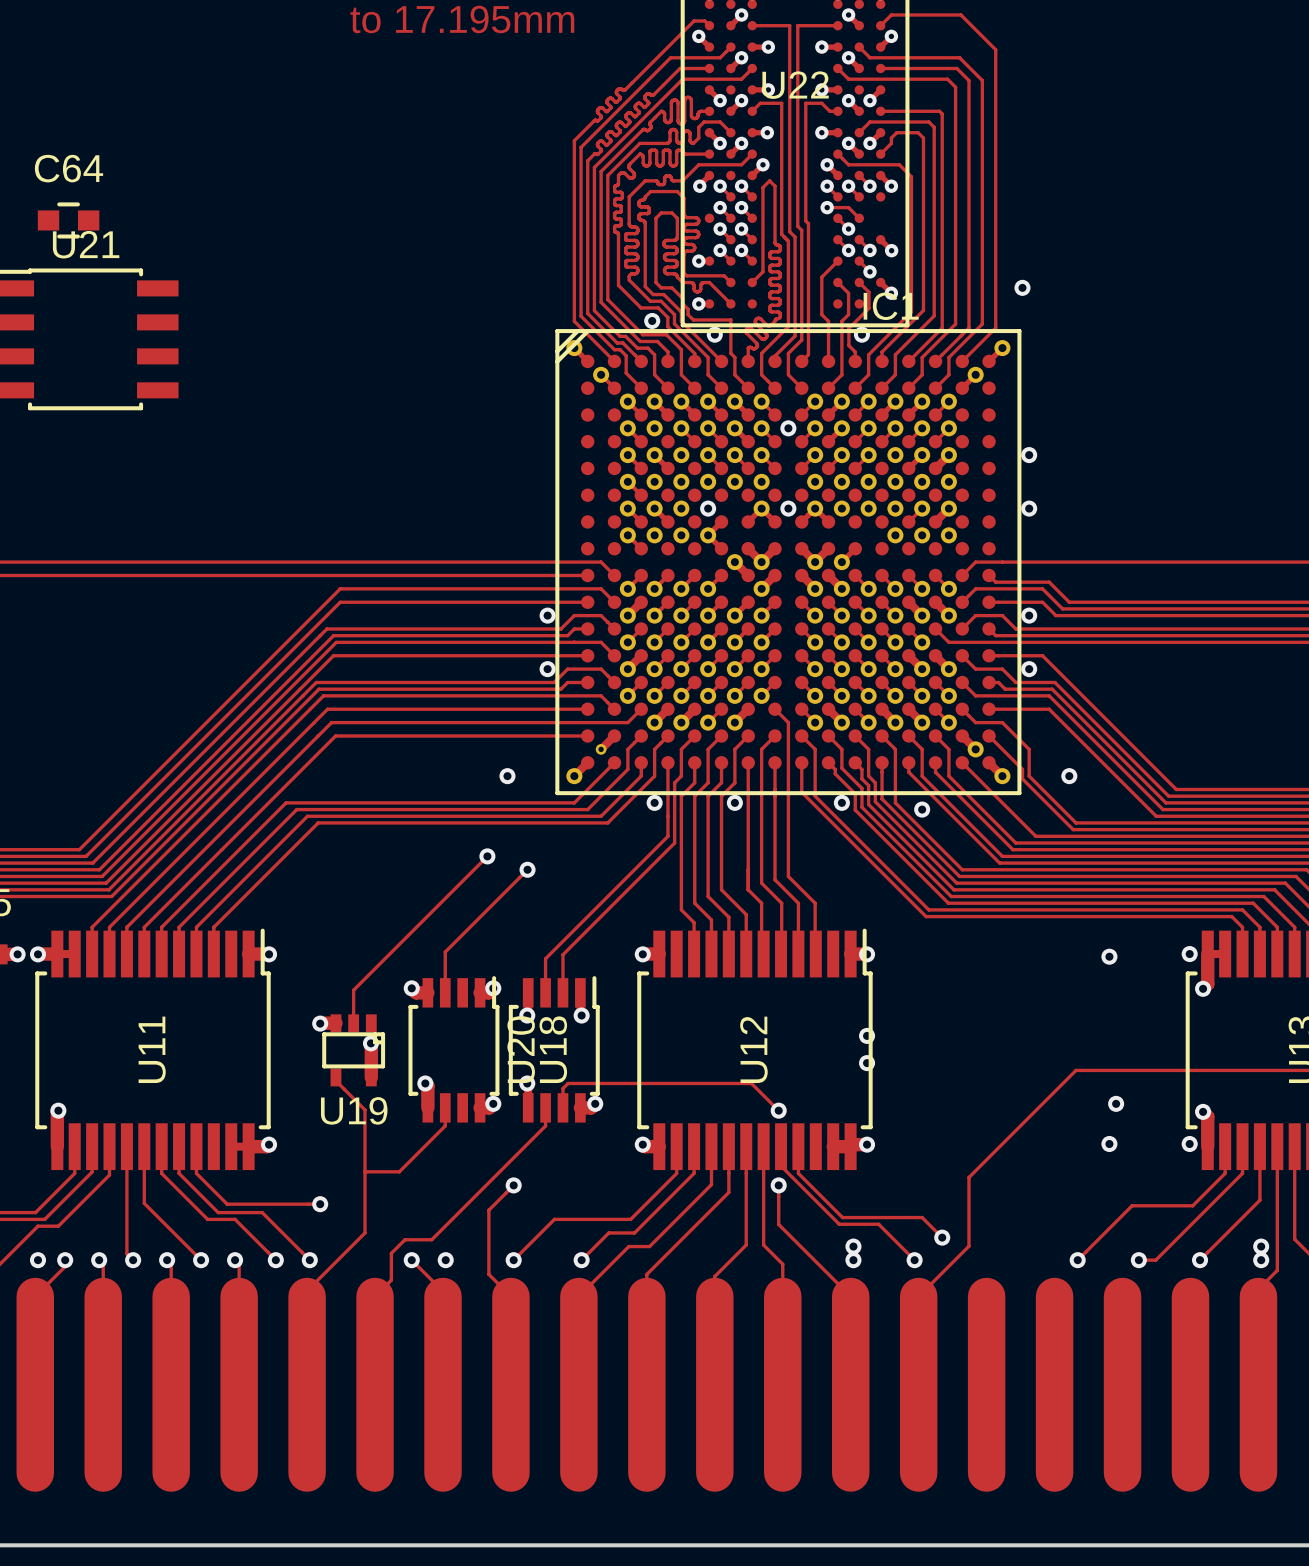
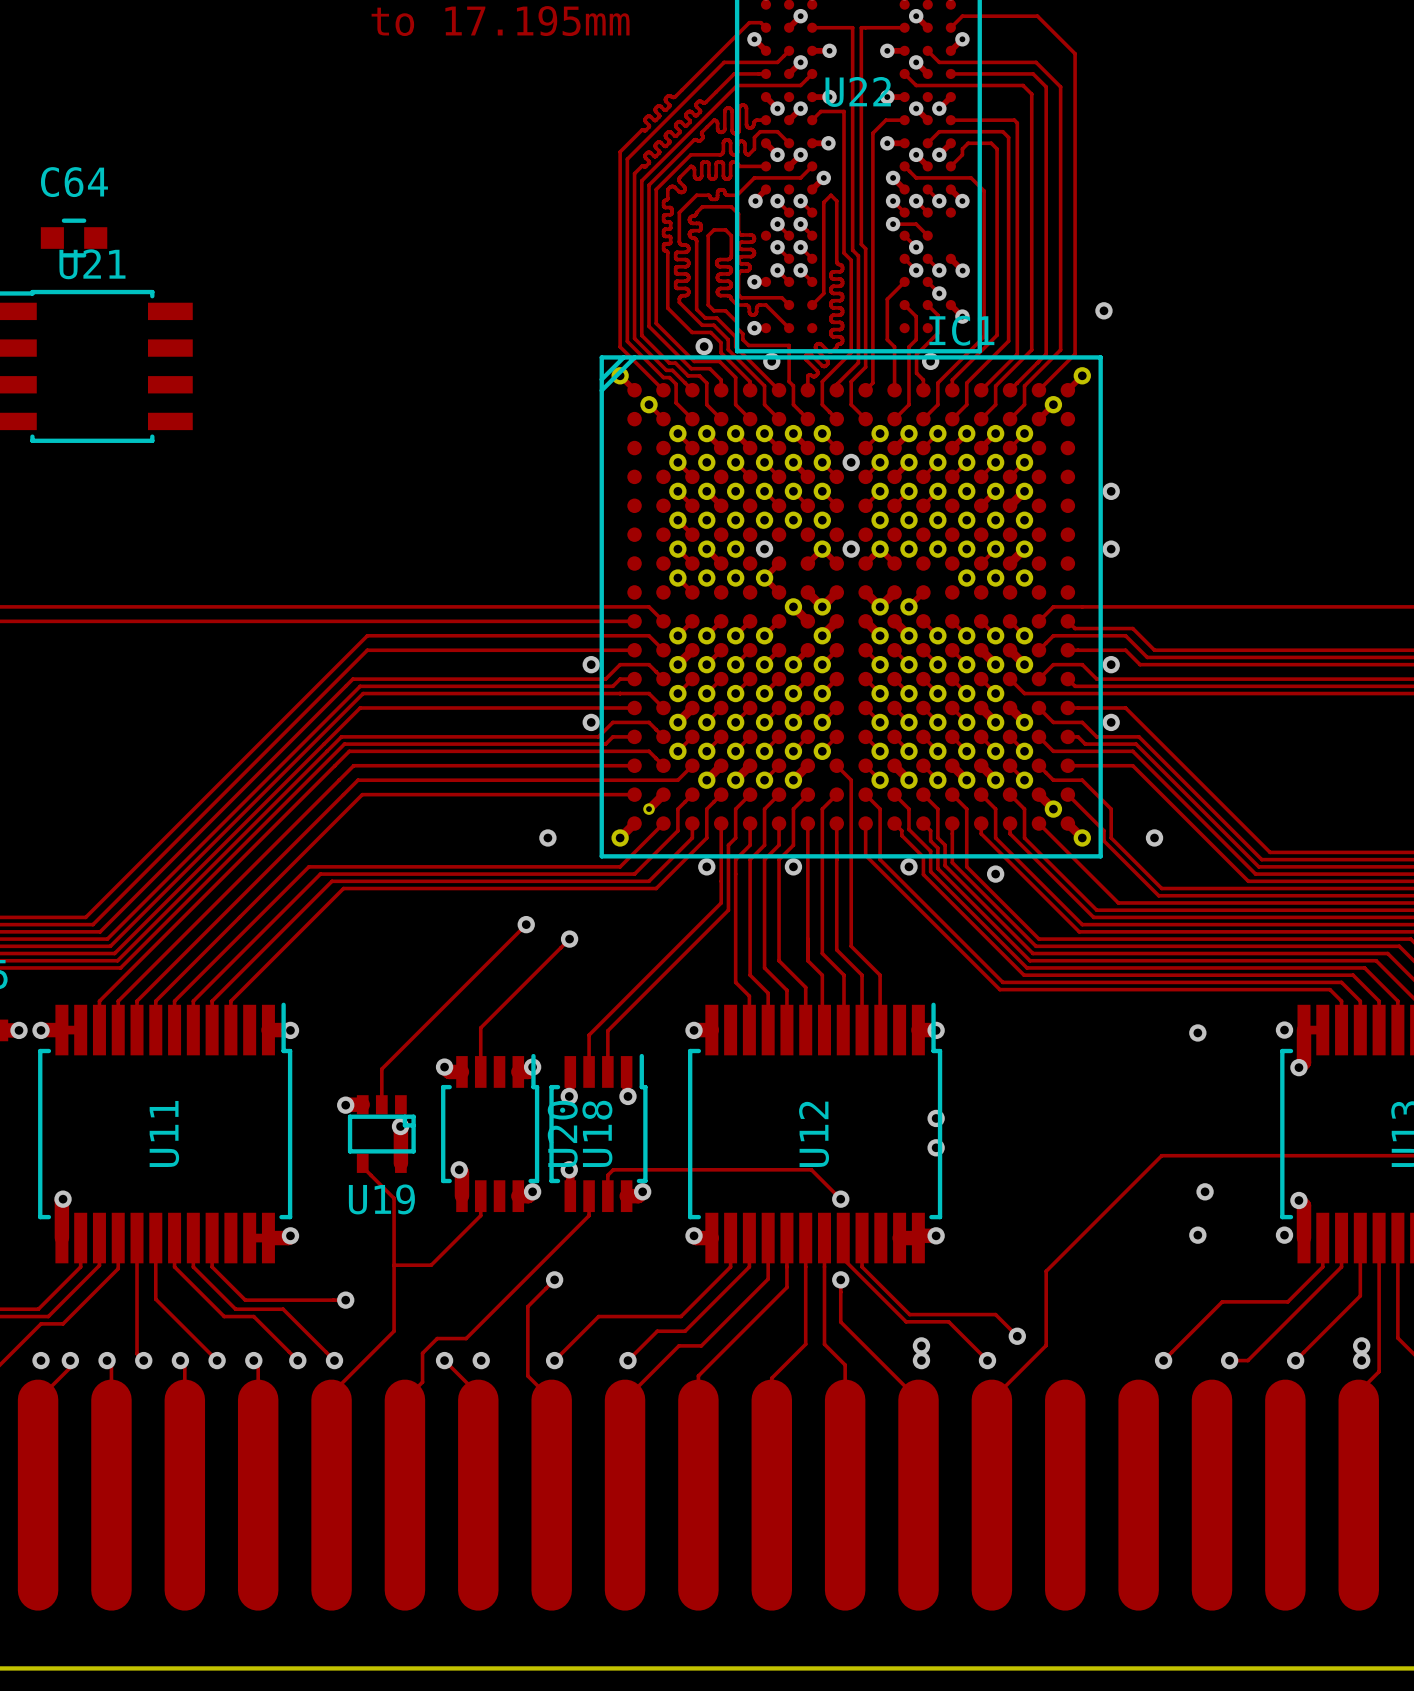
track: (829, 111) (821, 103) (805, 103) (805, 220) (808, 223) -> (895, 120) (885, 120) (872, 133) (872, 241)

